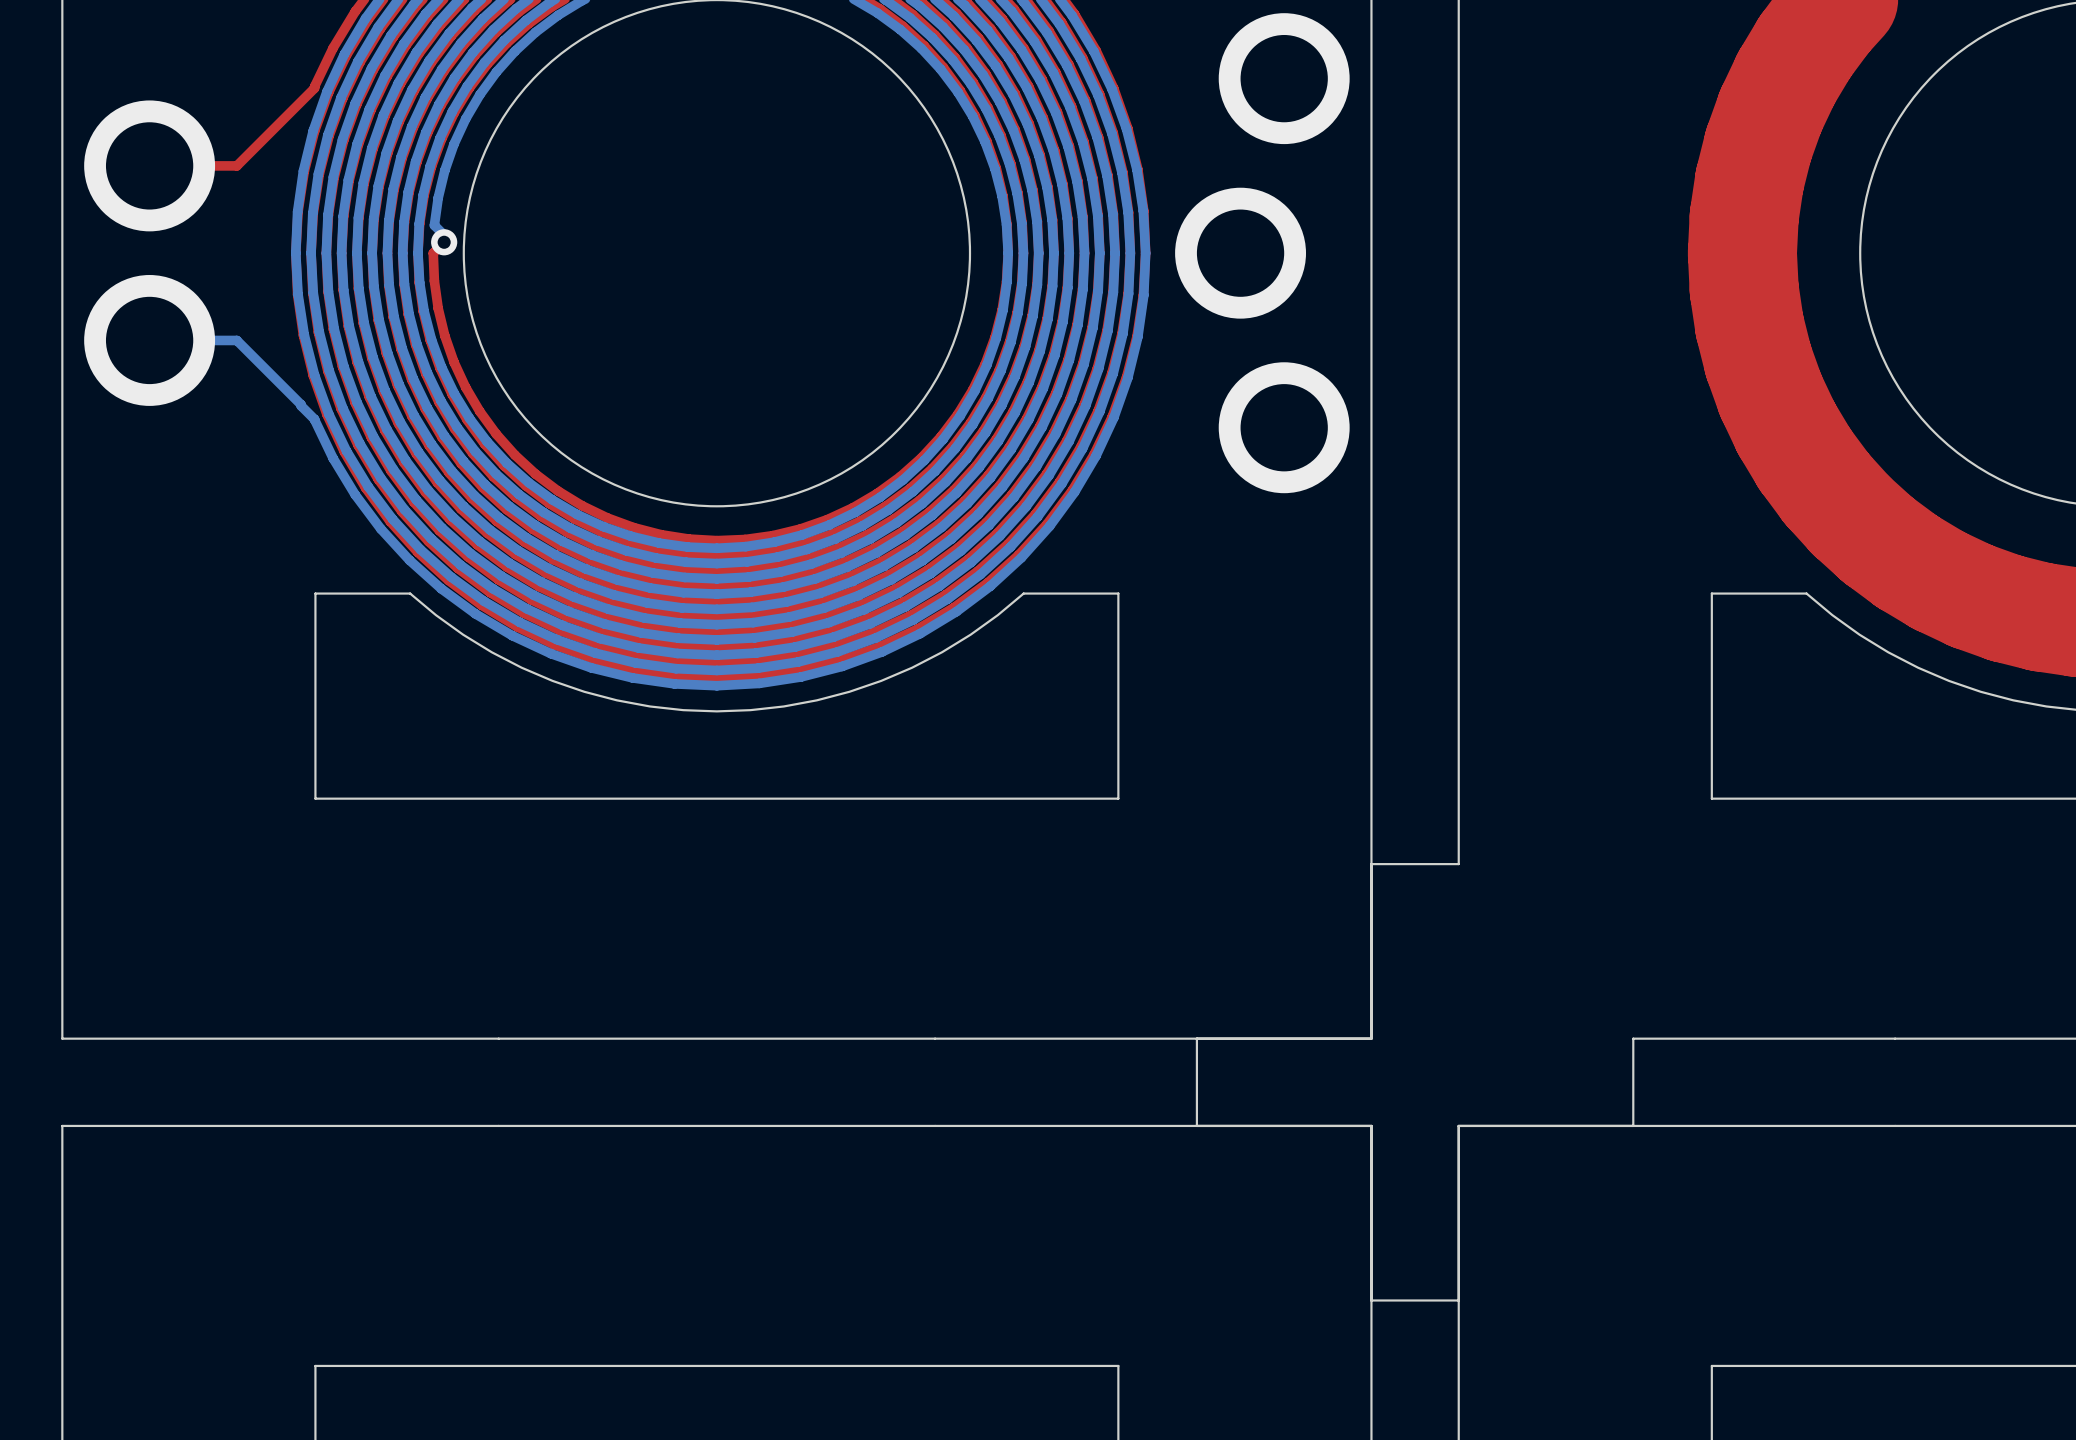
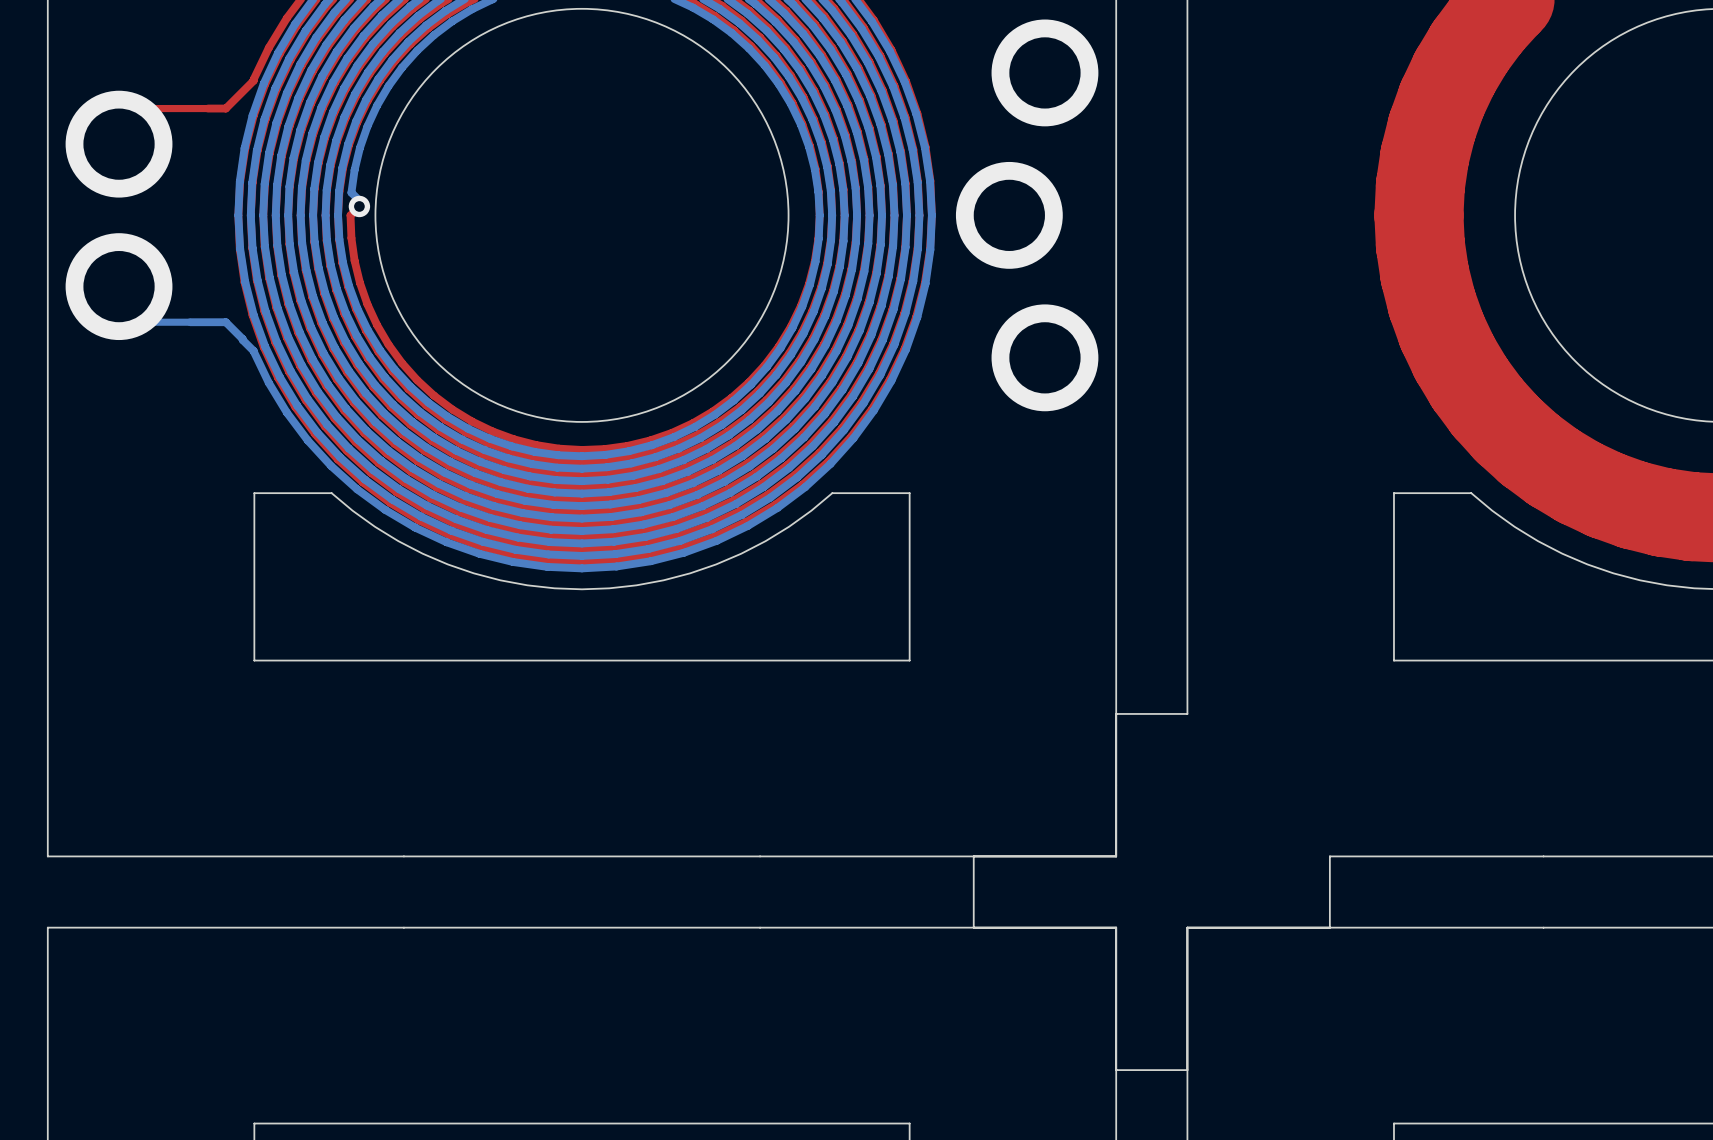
top track: (280, 122) (236, 165) (149, 165) -> (225, 108) (119, 108)
bottom track: (149, 340) (236, 340) (280, 384) -> (119, 322) (225, 322)

